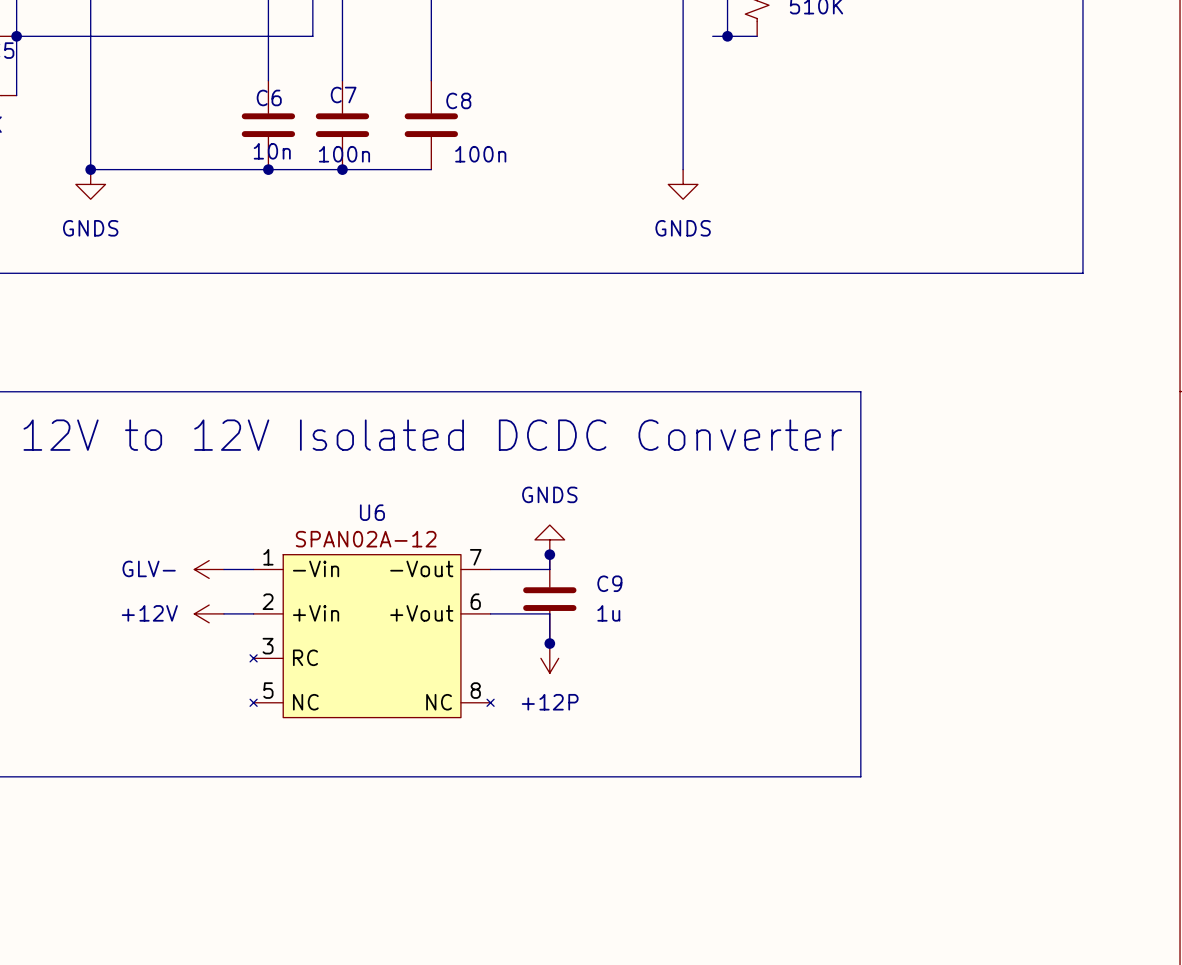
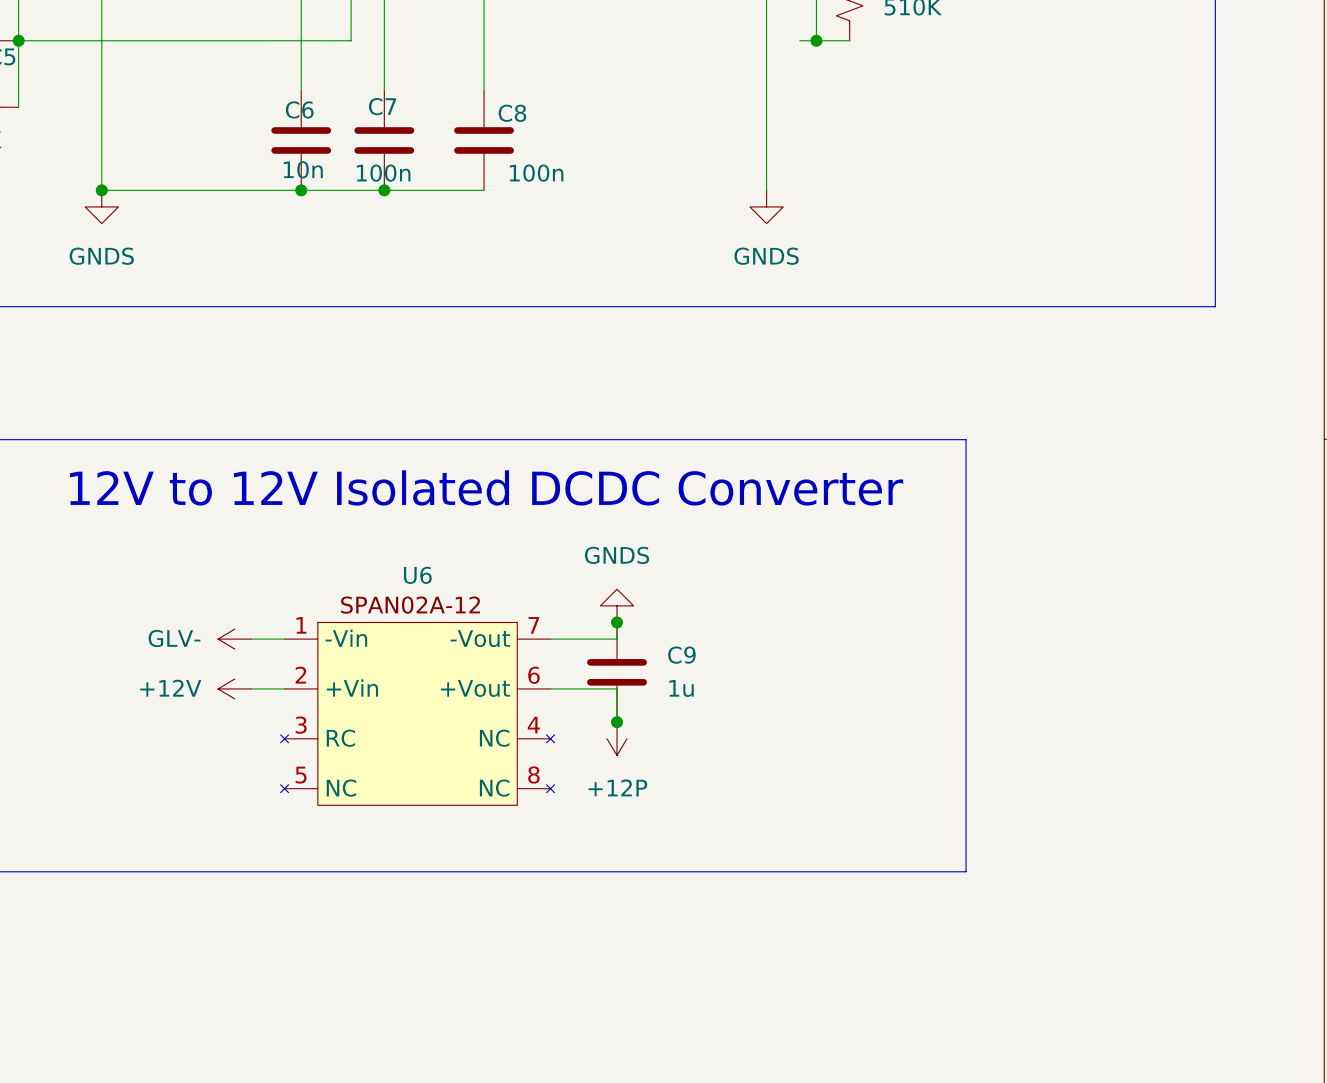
U6 symbol: [250, 554, 495, 718] -> [280, 622, 555, 806]

